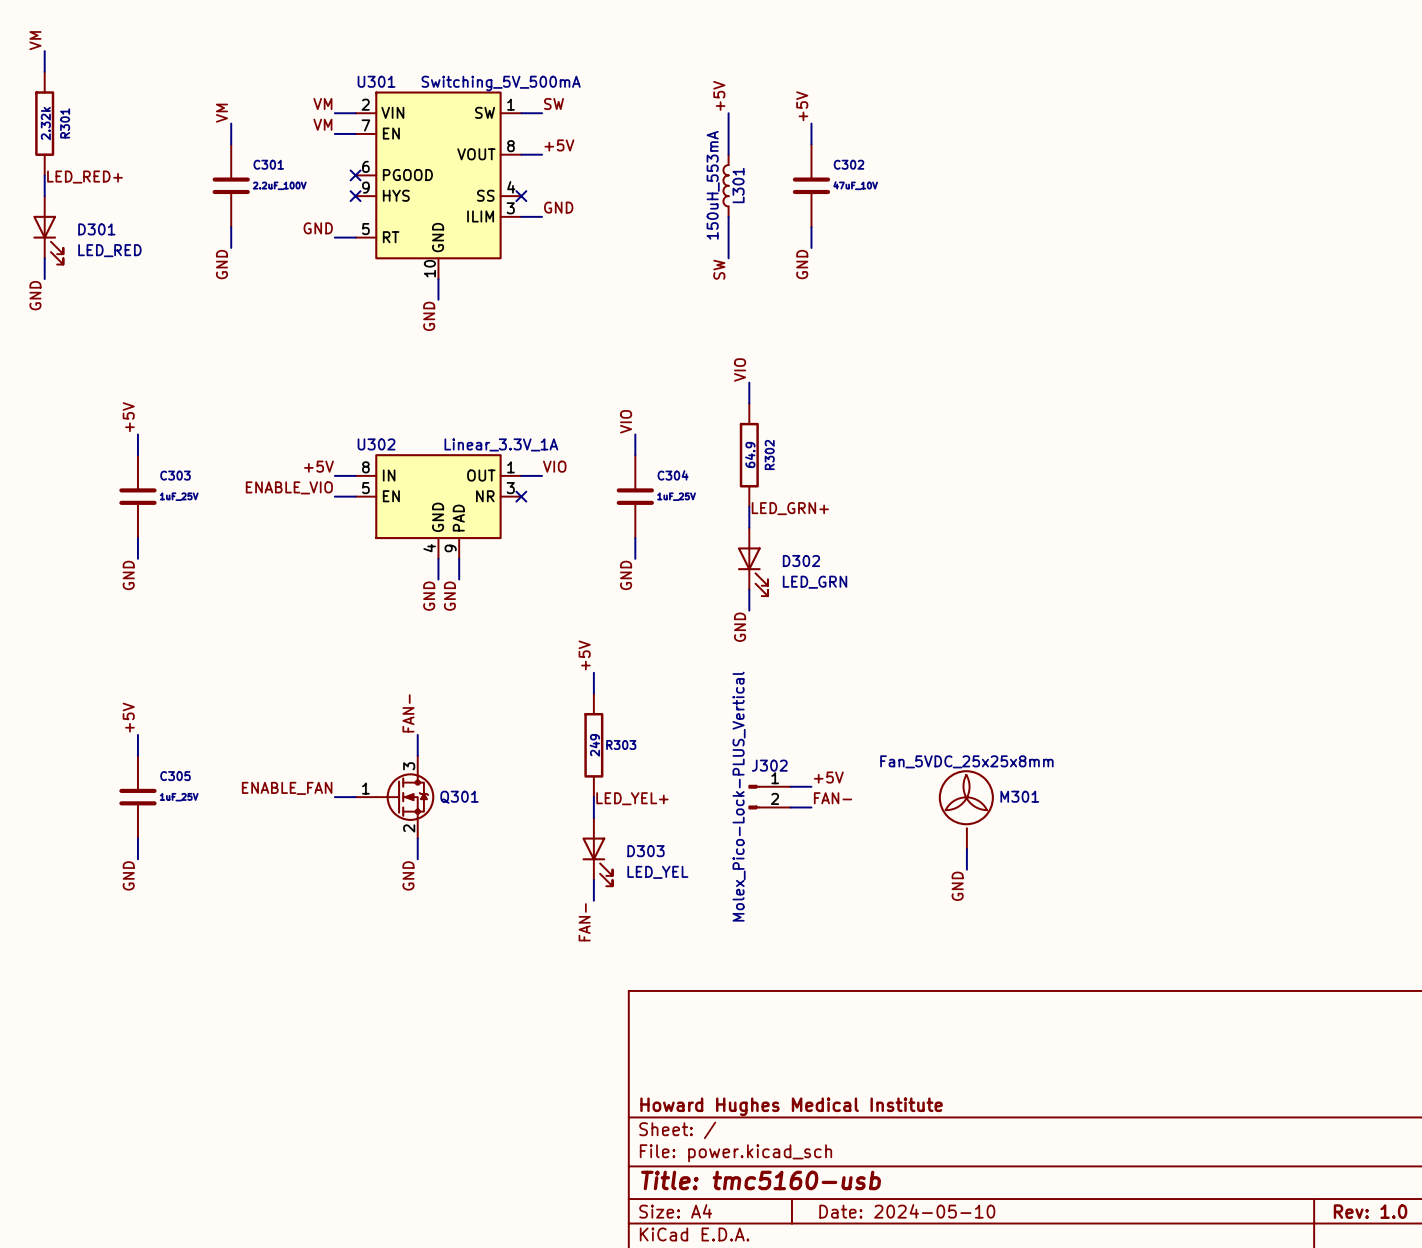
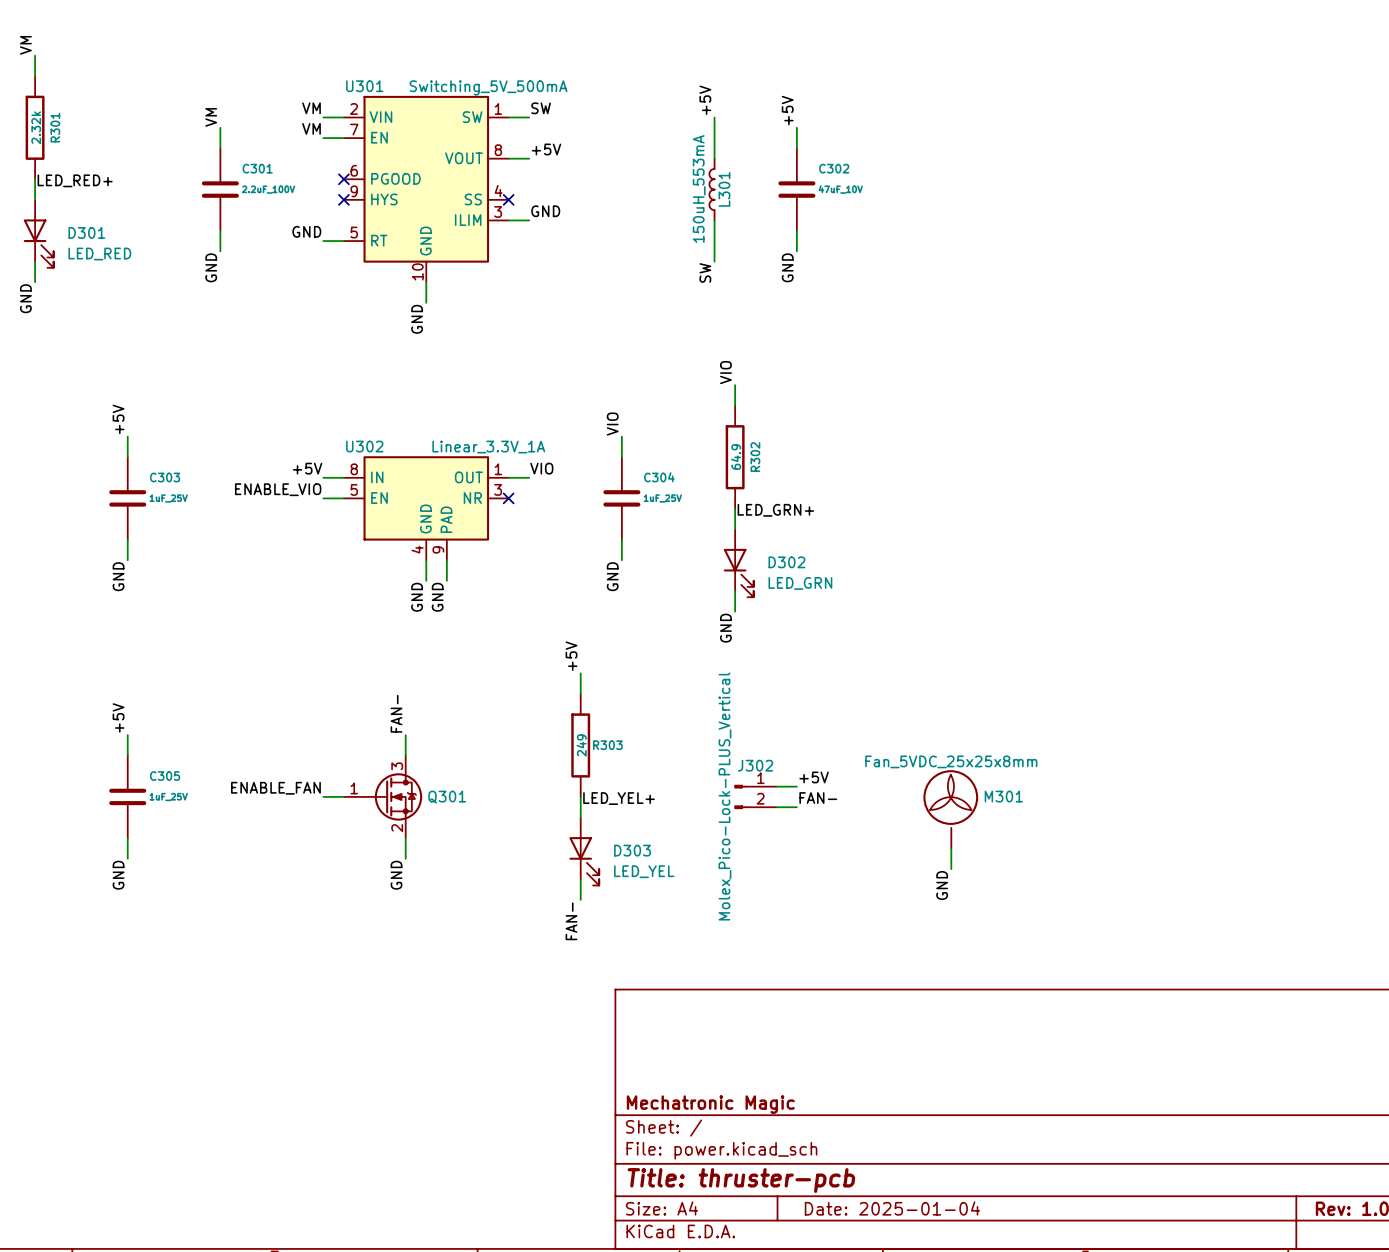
title block: Howard Hughes Medical Institute (791, 1106) -> Mechatronic Magic (710, 1104)
title block: Title: tmc5160-usb (761, 1180) -> Title: thruster-pcb (741, 1180)
title block: Date: 2024-05-10 (907, 1211) -> Date: 2025-01-04 (892, 1208)

